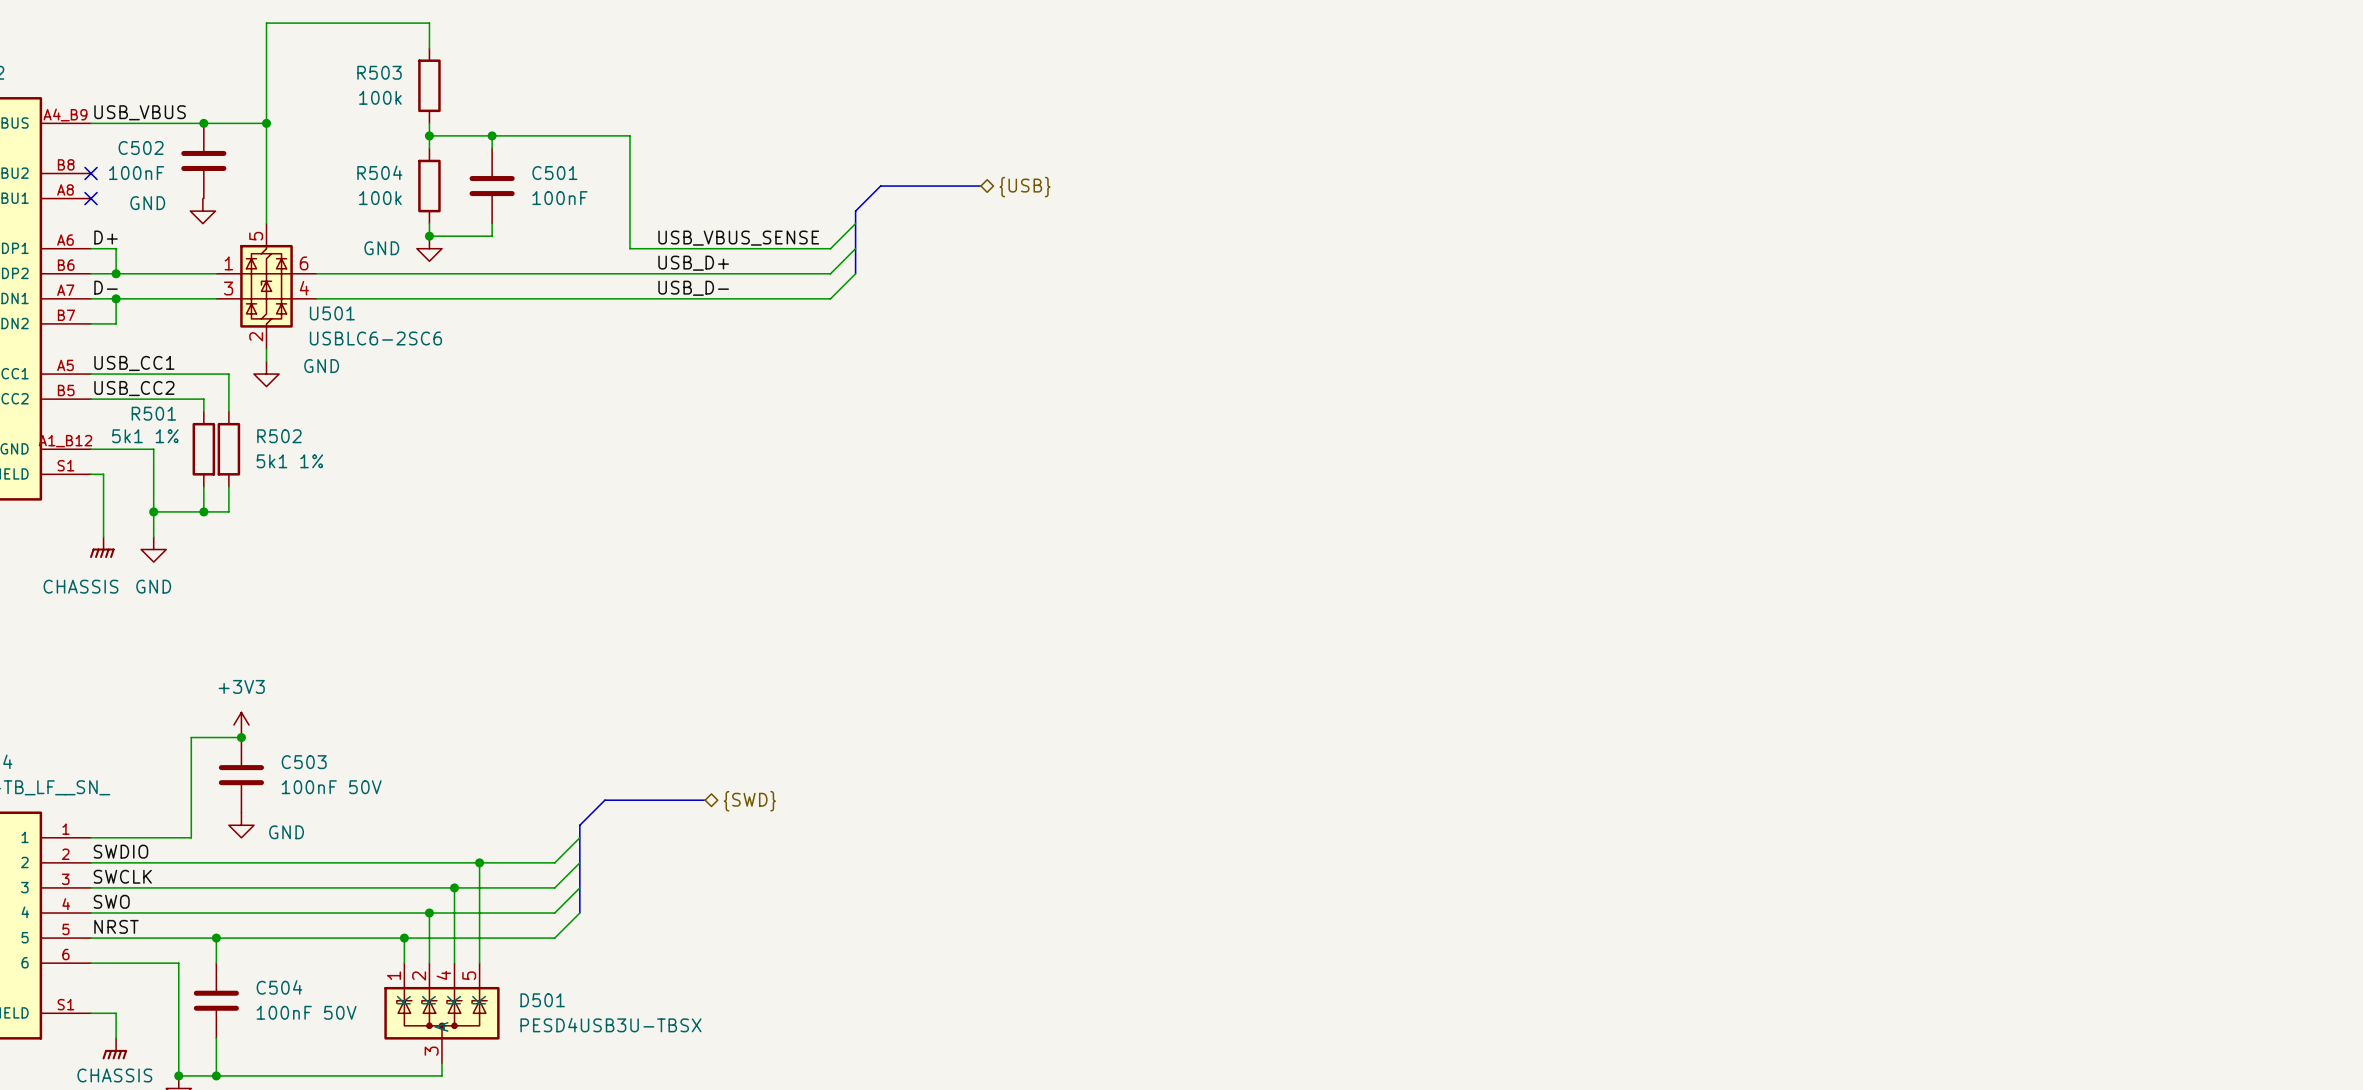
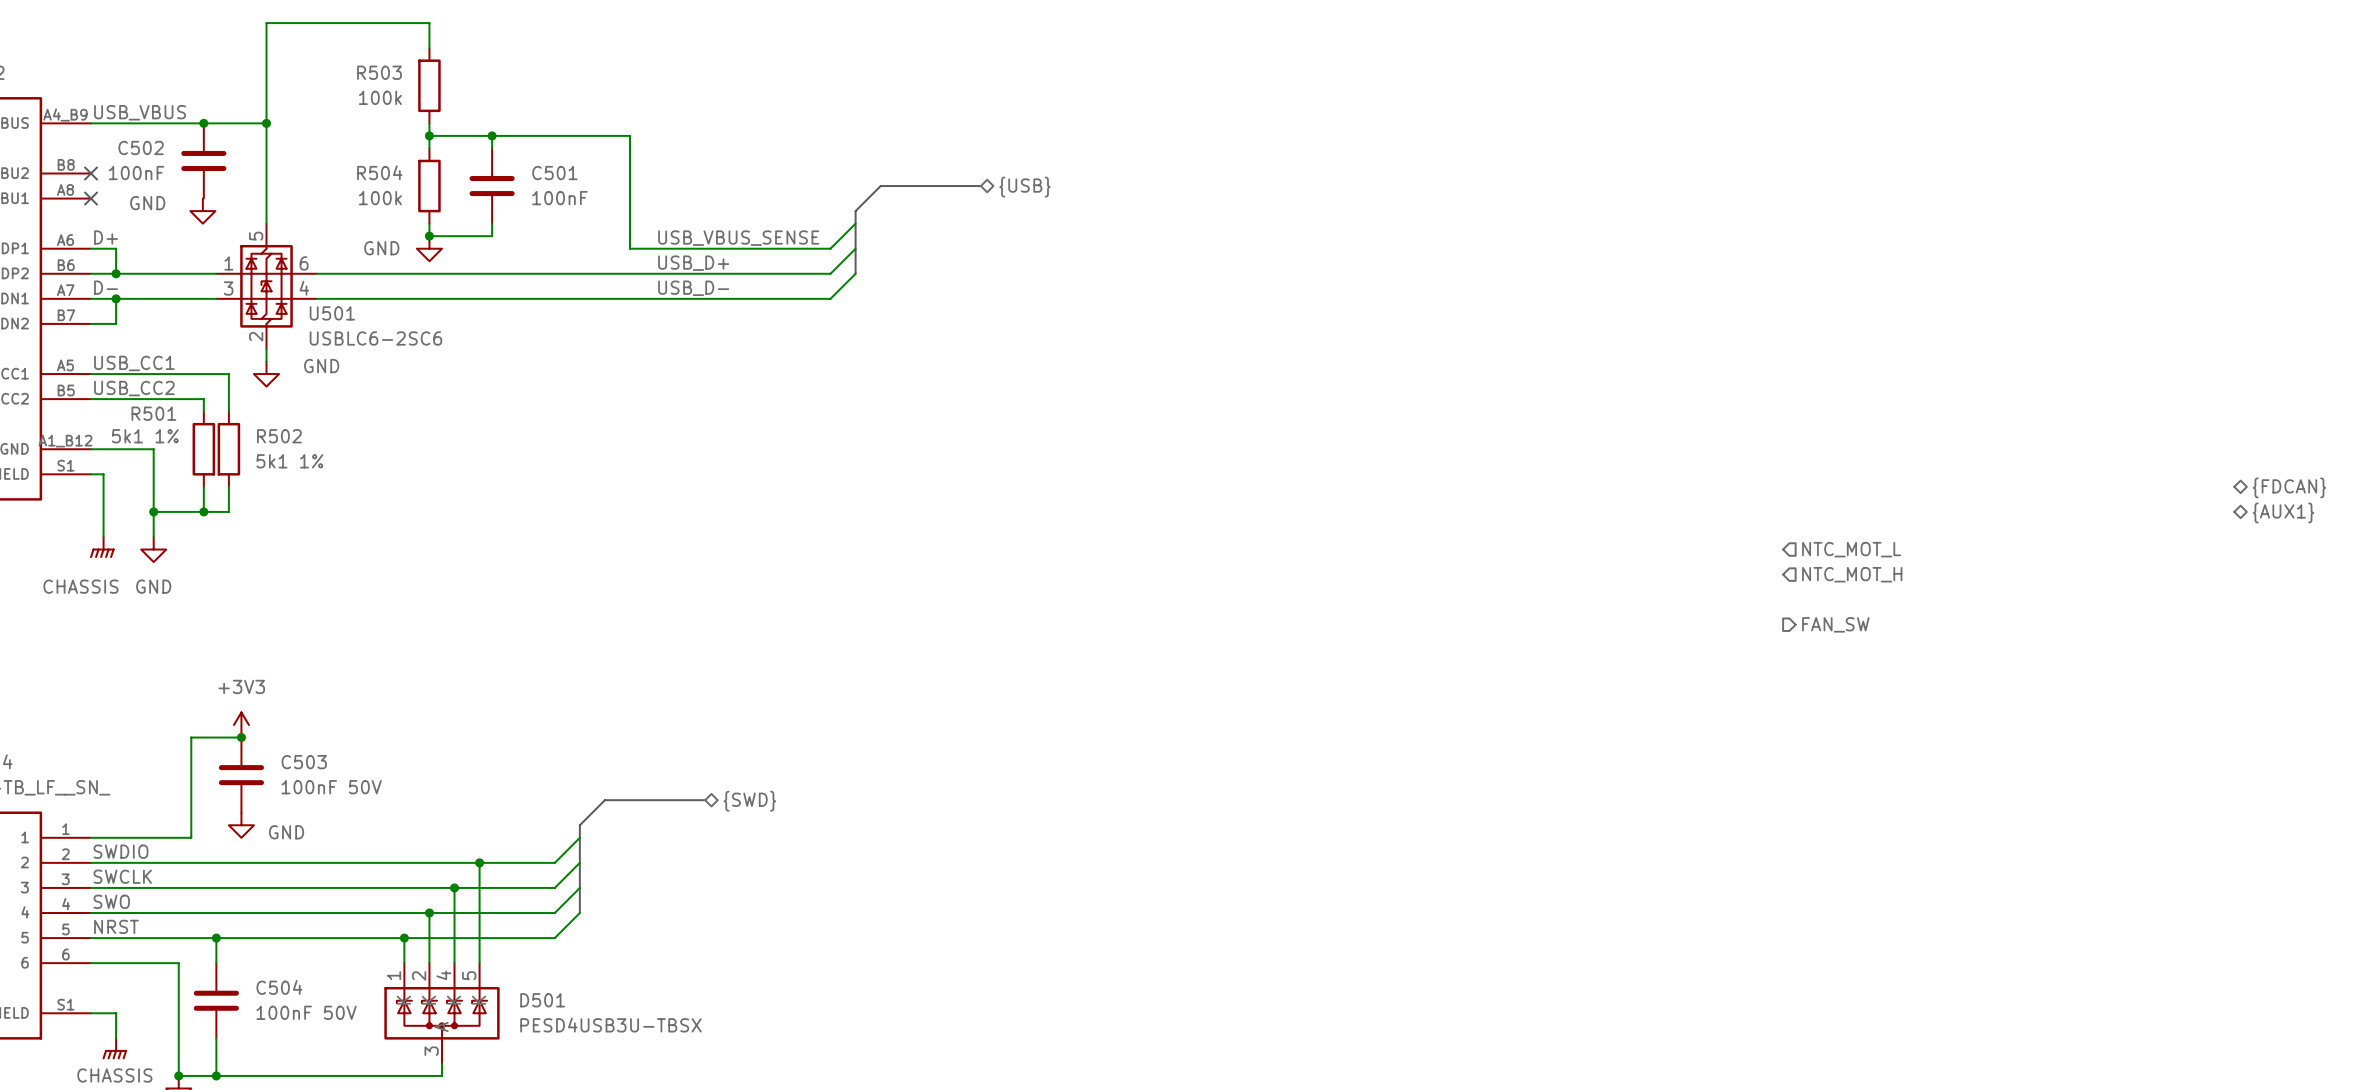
hierarchical label: none -> {FDCAN} (2289, 487)
hierarchical label: none -> {AUX1} (2283, 512)
hierarchical label: none -> NTC_MOT_L (1851, 549)
hierarchical label: none -> NTC_MOT_H (1852, 574)
hierarchical label: none -> FAN_SW (1835, 624)

